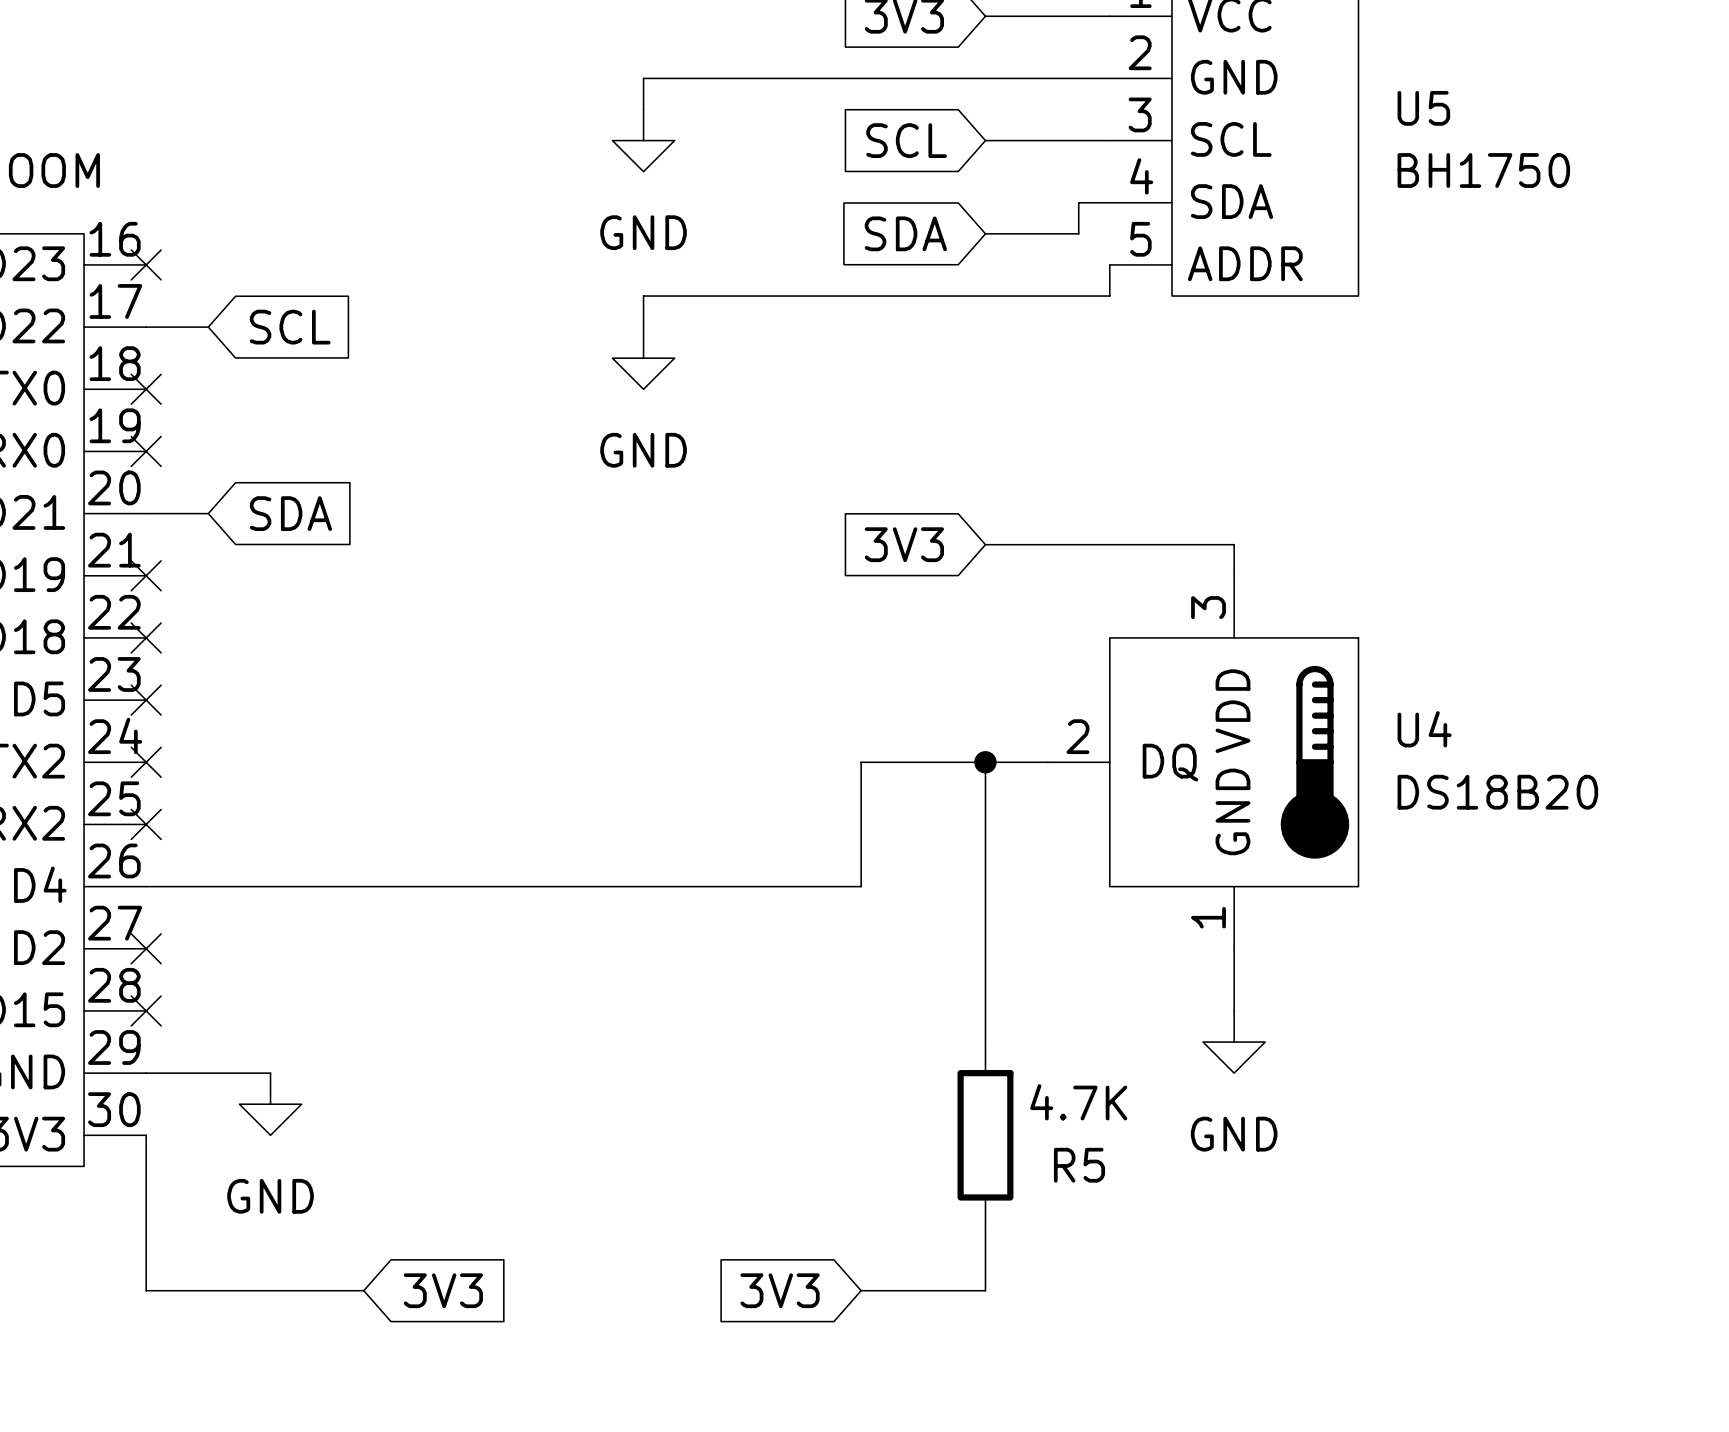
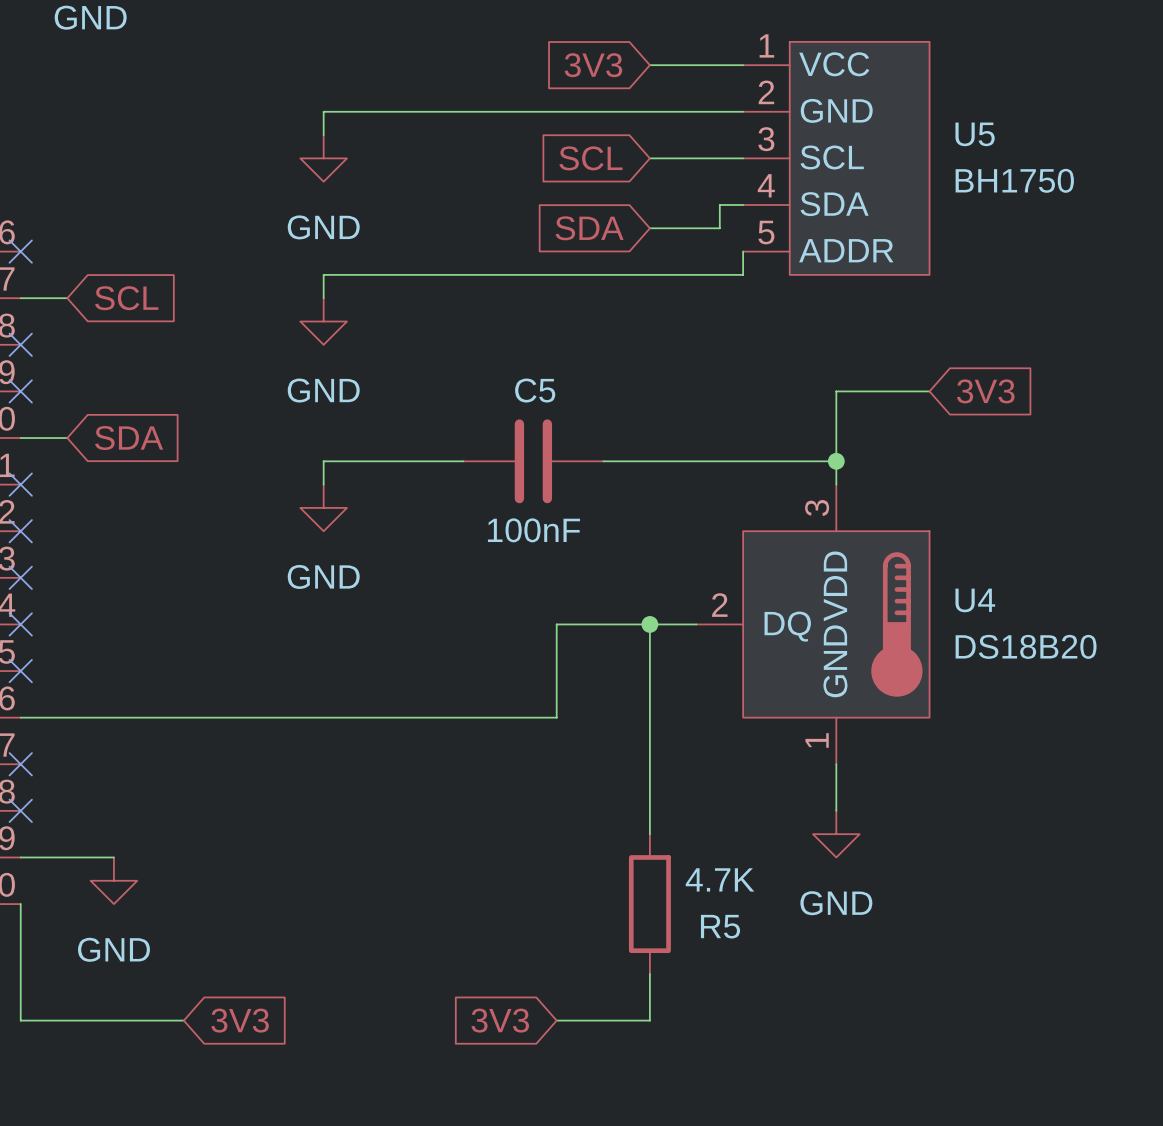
wire: (643, 78) (643, 109) -> (393, 111) (323, 111) (323, 135)
power symbol position: GND (643, 140) -> GND (323, 158)
wire: (643, 296) (643, 327) -> (393, 274) (323, 274) (323, 298)
power symbol position: GND (643, 358) -> GND (323, 321)
wire: none -> (929, 391) (836, 391) (836, 461)
wire: none -> (463, 461) (323, 461) (323, 484)
C5: none -> 100nF (533, 461)
global label rotation: 0° (904, 544) -> 180° (985, 391)
global label position: 3V3 (904, 544) -> 3V3 (985, 391)
wire: none -> (603, 461) (649, 461)
junction: none -> (836, 461)
power symbol: none -> GND (323, 507)

